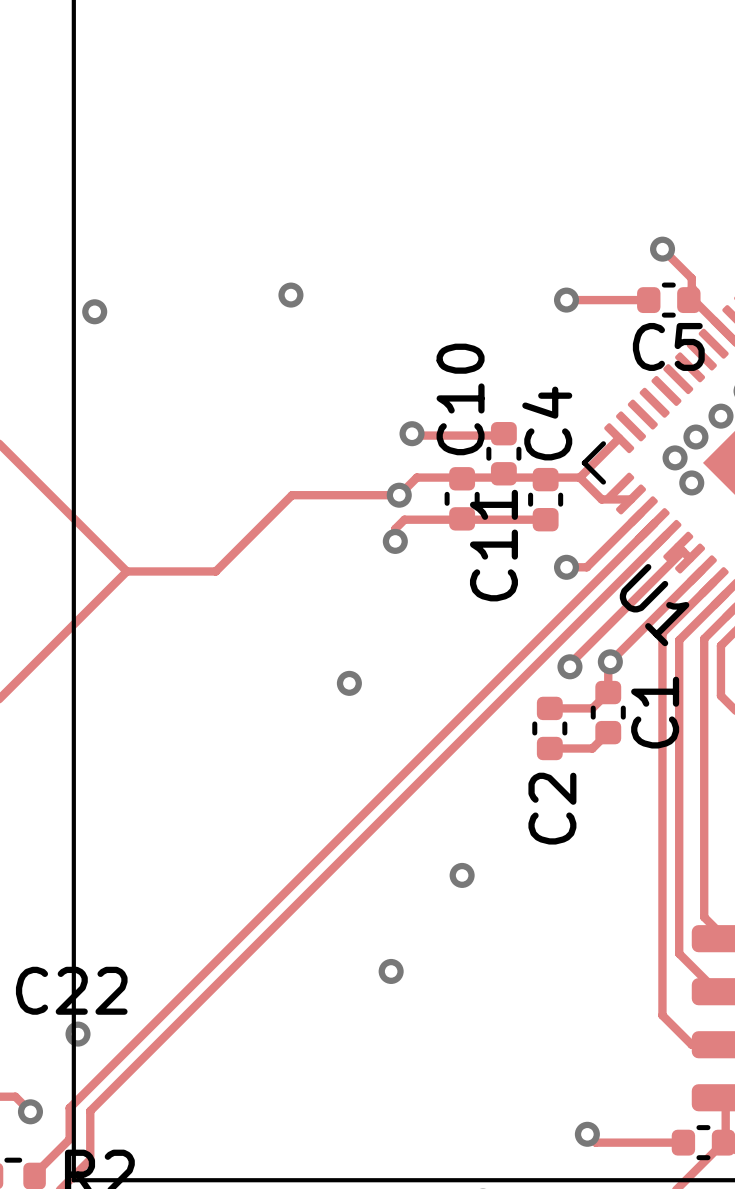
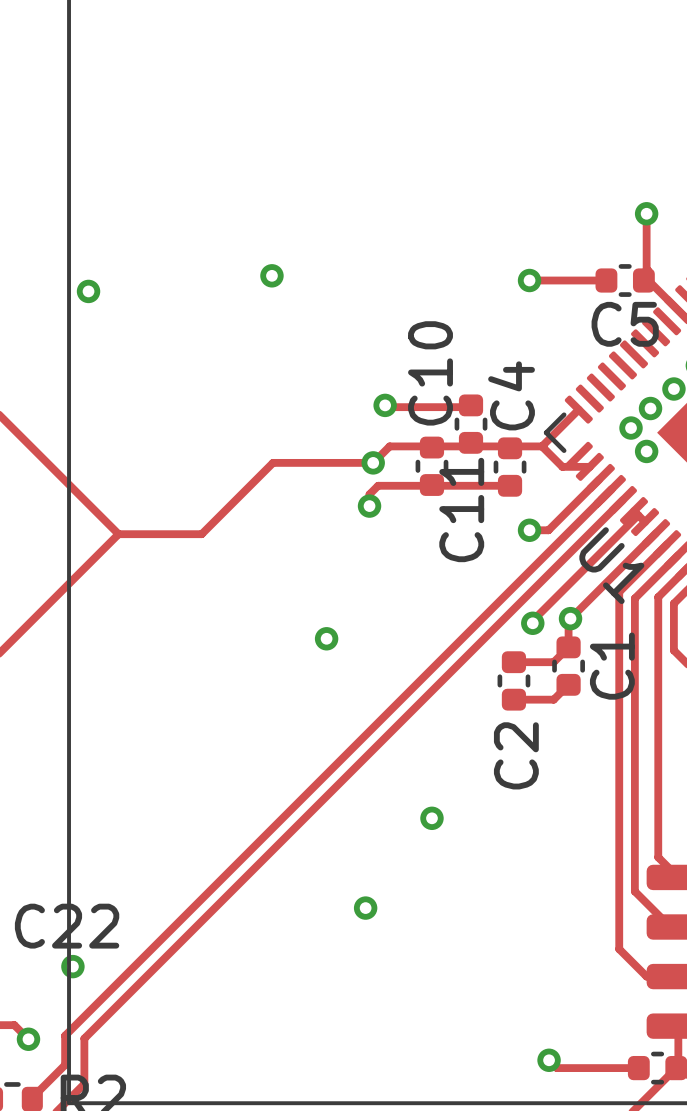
track: (662, 249) (691, 278) -> (646, 213) (646, 260)
via position: (662, 249) -> (646, 213)

